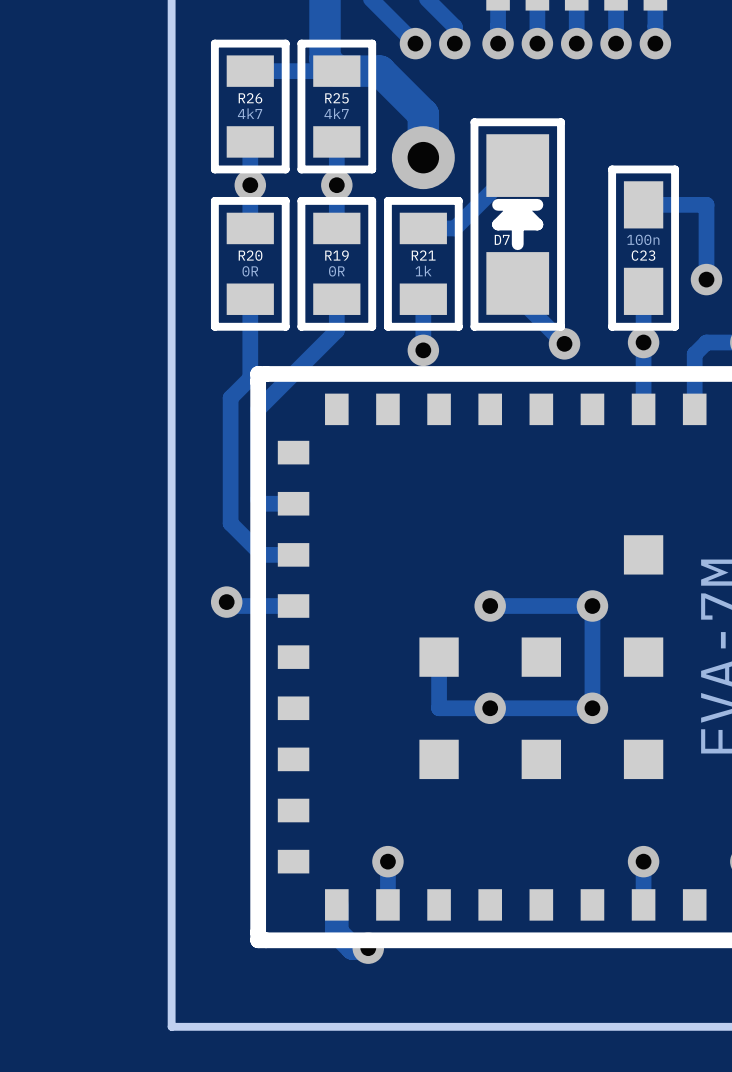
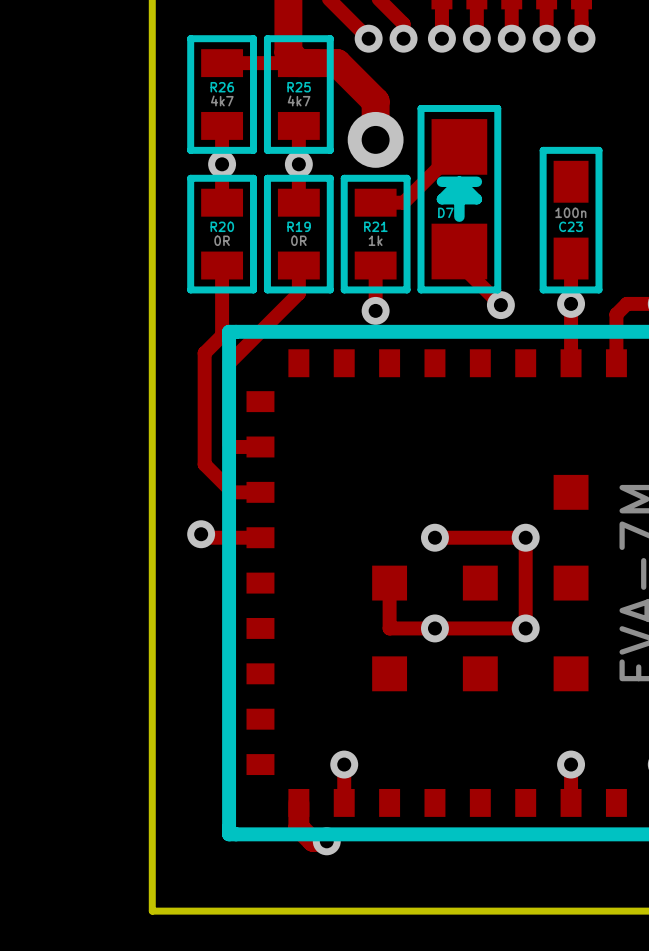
track: (643, 204) (706, 204) (706, 279) -> none
via: (706, 279) -> none

